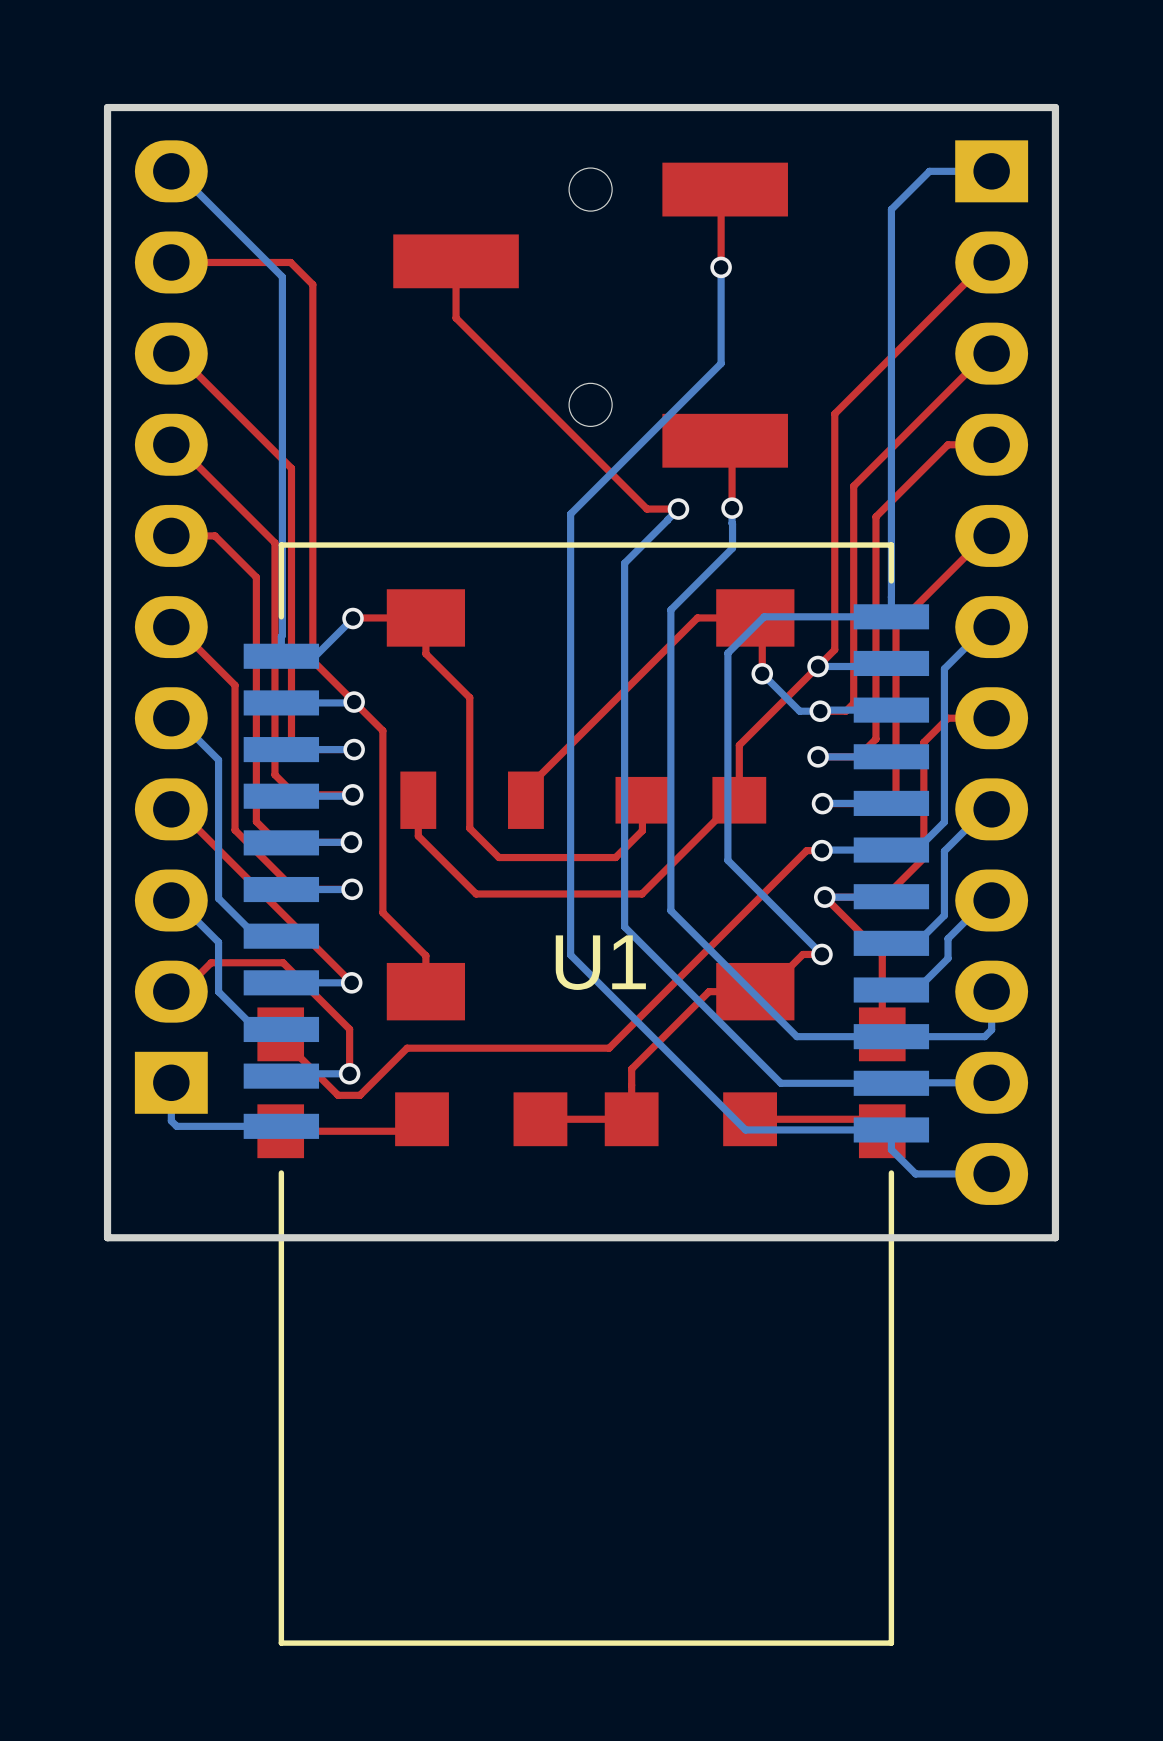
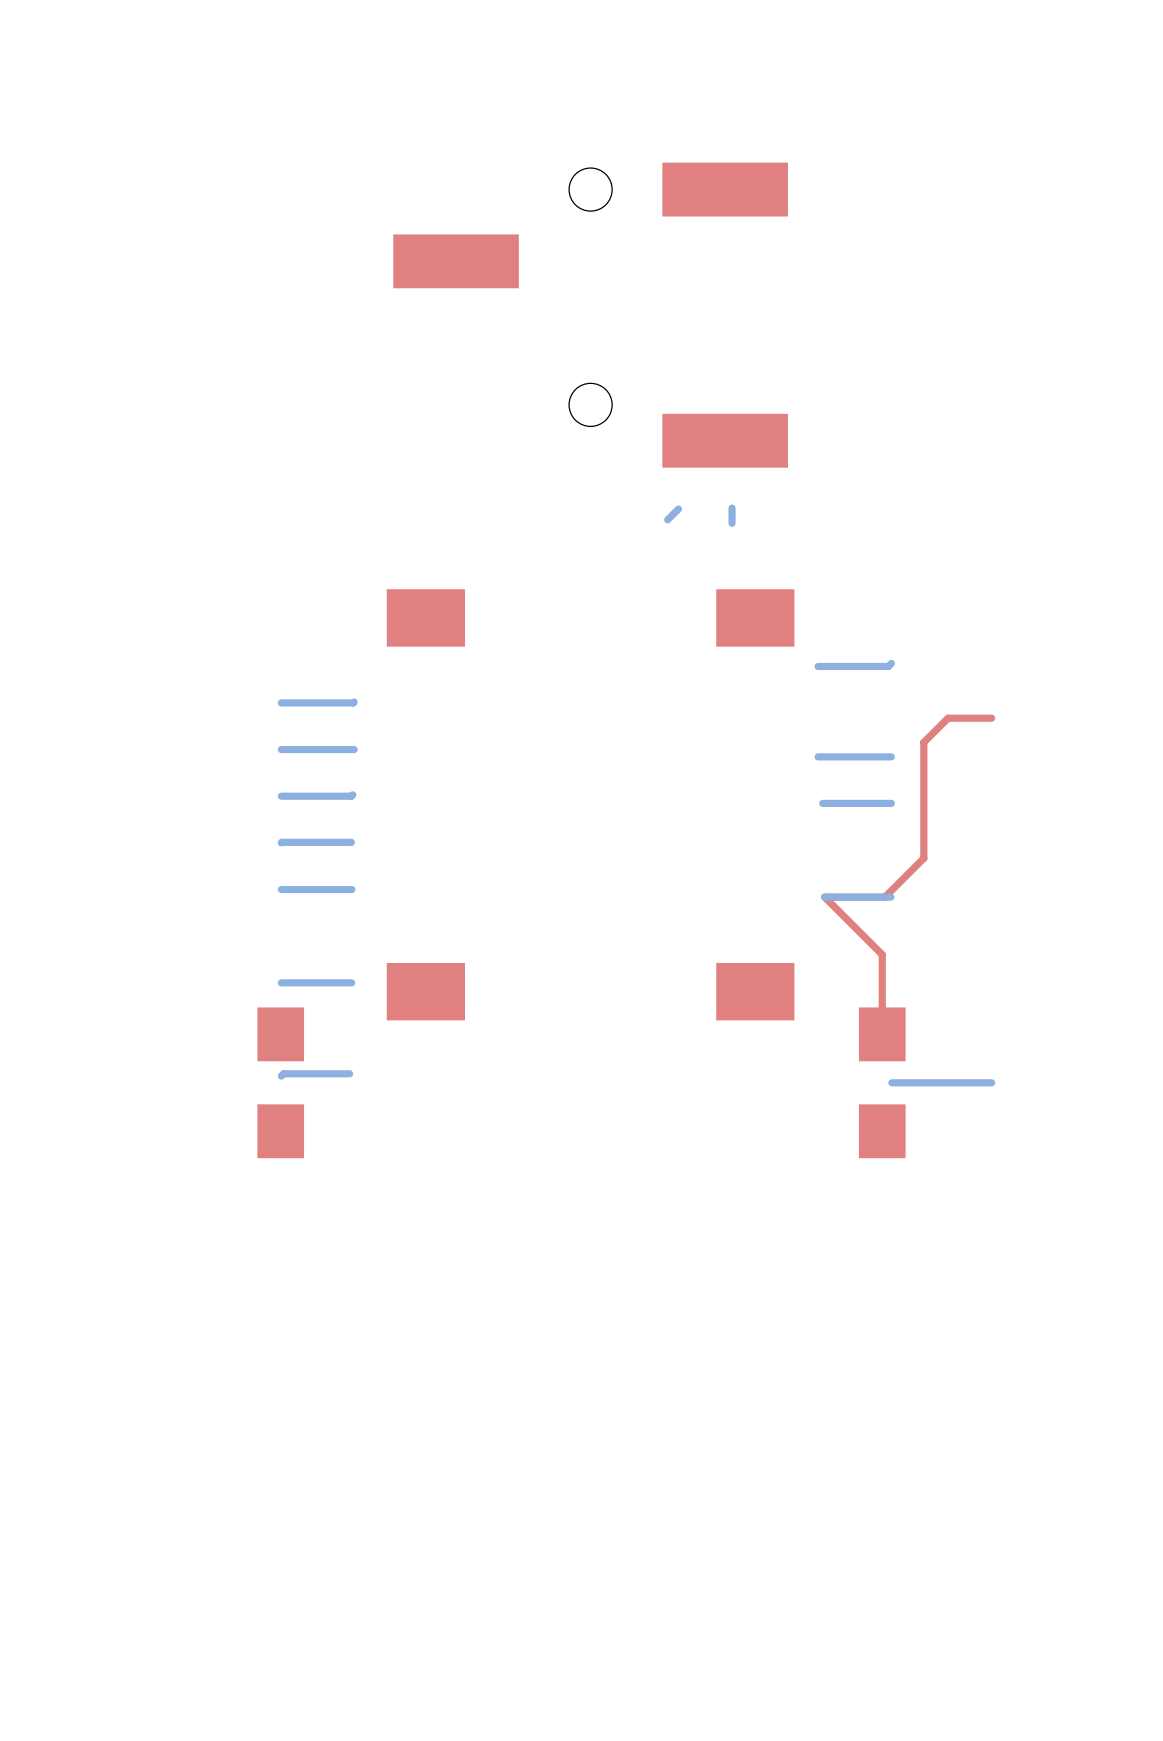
board edge: (1055, 107) (1055, 1237) (107, 1237) (107, 107) (1055, 107) -> none
bottom track: (171, 171) (176, 171) (282, 276) (281, 656) (315, 656) (353, 618) -> none
bottom track: (991, 171) (929, 171) (891, 209) (891, 616) (764, 616) (727, 653) (727, 860) (821, 954) -> none
top track: (725, 189) (721, 193) (721, 267) -> none
top track: (456, 261) (456, 318) (647, 509) (678, 509) -> none
top track: (171, 262) (290, 262) (312, 284) (312, 660) (382, 730) (382, 912) (425, 955) (425, 991) -> none
top track: (991, 262) (986, 262) (834, 413) (834, 649) (739, 745) (739, 800) (735, 800) (641, 894) (476, 894) (418, 836) (418, 800) -> none
bottom track: (721, 267) (721, 363) (570, 514) (570, 955) (745, 1129) (891, 1129) (891, 1149) (915, 1173) (991, 1173) -> none
via: (721, 267) -> none
top track: (171, 353) (176, 353) (291, 468) (291, 742) (299, 749) (354, 749) -> none
top track: (991, 353) (986, 353) (853, 486) (853, 703) (845, 711) (820, 711) -> none
top track: (725, 440) (732, 447) (732, 508) -> none
top track: (171, 444) (176, 444) (274, 542) (274, 774) (294, 794) (352, 794) -> none
top track: (991, 444) (948, 444) (875, 516) (875, 739) (858, 756) (818, 756) -> none
via: (732, 508) -> none
via: (678, 509) -> none
bottom track: (667, 520) (624, 563) (624, 926) (780, 1083) (891, 1083) -> none
bottom track: (732, 523) (732, 548) (670, 609) (670, 910) (796, 1036) (984, 1036) (991, 1029) (991, 991) -> none
top track: (171, 535) (214, 535) (256, 577) (256, 821) (277, 842) (351, 842) -> none
top track: (991, 535) (986, 535) (896, 626) (896, 803) (822, 803) -> none
top track: (353, 618) (425, 617) (425, 653) (469, 697) (469, 828) (498, 857) (615, 857) (642, 830) (642, 800) -> none
via: (353, 618) -> none
top track: (171, 627) (176, 627) (235, 685) (235, 830) (294, 889) (352, 889) -> none
part: (171, 627) -> none
bottom track: (991, 627) (986, 627) (944, 668) (944, 822) (916, 850) (821, 850) -> none
via: (818, 666) -> none
part: (991, 672) -> none
bottom track: (762, 673) (799, 711) (891, 710) -> none
top track: (762, 673) (762, 624) (755, 617) (697, 617) (525, 789) (525, 800) -> none
via: (762, 673) -> none
via: (354, 702) -> none
via: (820, 711) -> none
bottom track: (171, 718) (176, 718) (218, 759) (218, 898) (256, 936) (281, 936) -> none
via: (354, 749) -> none
via: (818, 756) -> none
via: (352, 794) -> none
part: (472, 800) -> none
part: (690, 800) -> none
via: (822, 803) -> none
top track: (171, 809) (178, 809) (351, 982) -> none
bottom track: (991, 809) (986, 809) (944, 851) (944, 915) (916, 943) (891, 943) -> none
via: (351, 842) -> none
top track: (821, 850) (806, 850) (609, 1048) (407, 1048) (359, 1095) (338, 1095) (280, 1037) (280, 1034) -> none
via: (821, 850) -> none
via: (352, 889) -> none
via: (824, 897) -> none
bottom track: (171, 900) (176, 900) (218, 942) (218, 991) (256, 1029) (281, 1029) -> none
bottom track: (991, 900) (986, 900) (948, 938) (948, 958) (916, 990) (891, 990) -> none
top track: (821, 954) (802, 954) (765, 991) (709, 991) (631, 1069) (631, 1119) (540, 1119) -> none
via: (821, 954) -> none
via: (351, 982) -> none
top track: (171, 991) (182, 991) (211, 962) (283, 962) (349, 1029) (349, 1073) -> none
via: (349, 1073) -> none
bottom track: (171, 1082) (171, 1120) (176, 1126) (281, 1126) -> none
U1: (586, 1094) -> none
top track: (422, 1119) (410, 1131) (280, 1131) -> none
part: (481, 1119) -> none
part: (690, 1119) -> none
top track: (750, 1119) (870, 1119) (882, 1131) -> none

